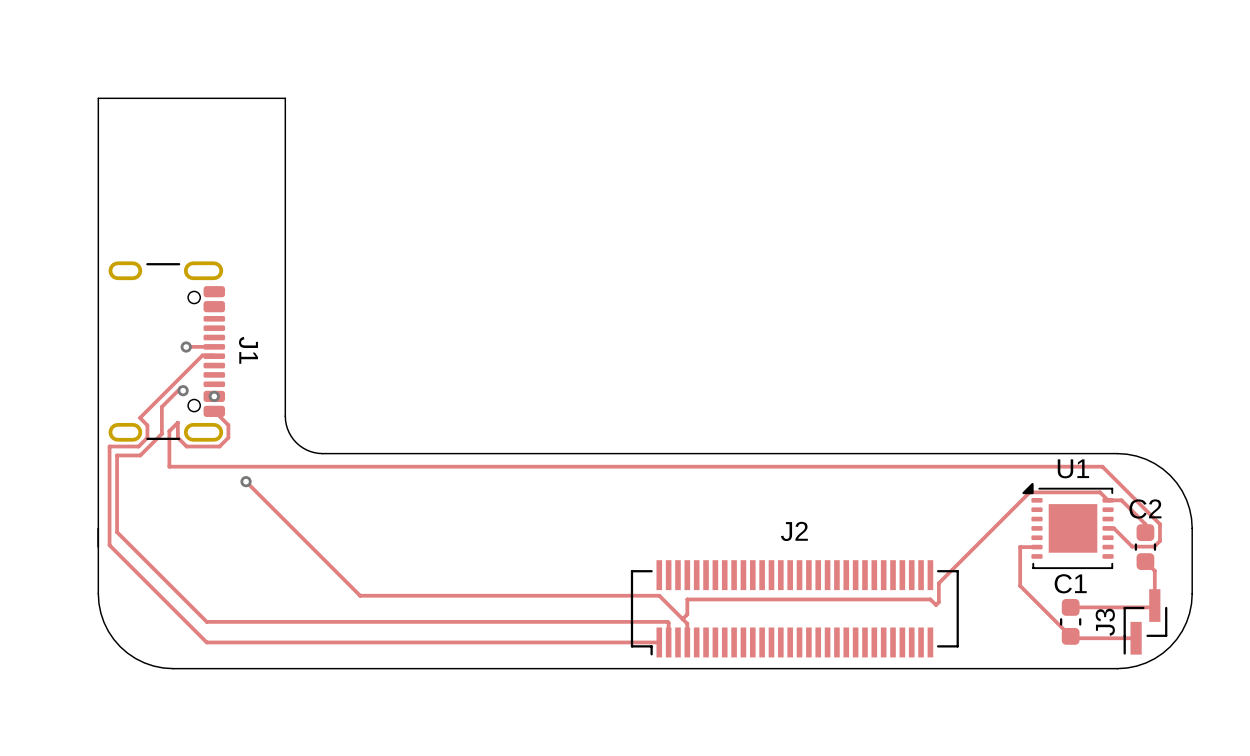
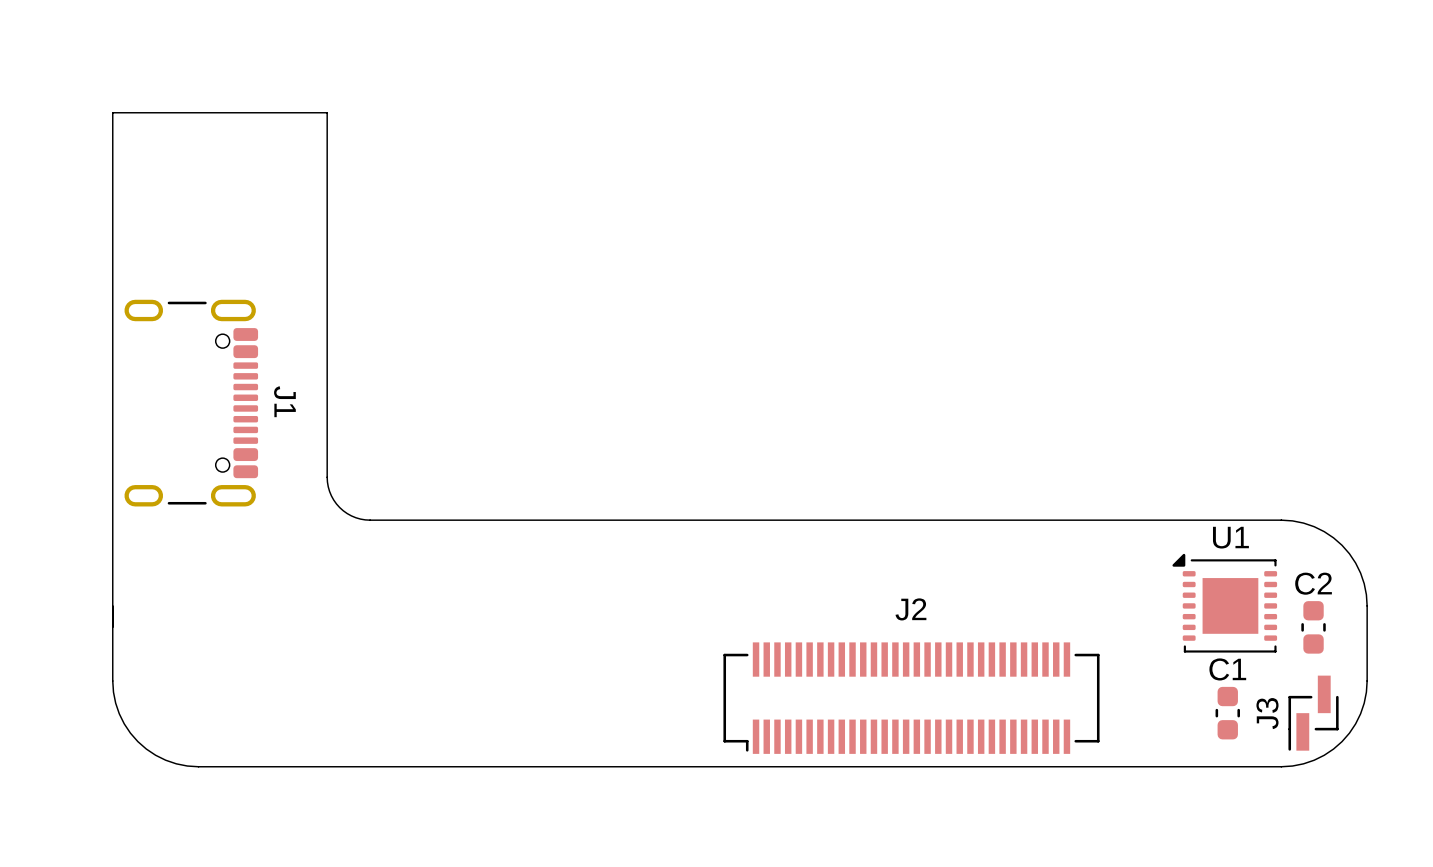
track: (186, 346) (214, 346) -> none
via: (186, 347) -> none
track: (213, 355) (202, 355) (140, 417) (147, 425) (147, 437) (138, 446) (109, 446) (109, 545) (206, 642) (659, 642) -> none
track: (183, 390) (180, 388) (161, 406) (161, 433) (140, 455) (117, 455) (117, 532) (206, 621) (667, 621) (668, 642) -> none
via: (183, 390) -> none
via: (214, 396) -> none
track: (213, 410) (228, 425) (228, 437) (219, 446) (186, 446) (177, 437) (177, 422) (169, 431) (169, 466) (1102, 466) (1159, 524) (1159, 541) (1154, 546) (1132, 546) (1113, 528) (1108, 528) -> none
track: (246, 481) (360, 595) (659, 595) (687, 623) (687, 642) -> none
via: (246, 481) -> none
track: (1145, 532) (1145, 524) (1121, 500) (1108, 500) (1100, 492) (1029, 492) (938, 583) (938, 602) (936, 605) (930, 599) (687, 599) (687, 614) (682, 619) -> none
track: (1037, 547) (1020, 547) (1020, 585) (1072, 638) (1136, 638) -> none
track: (1145, 561) (1154, 570) (1154, 605) (1152, 607) (1070, 607) -> none

